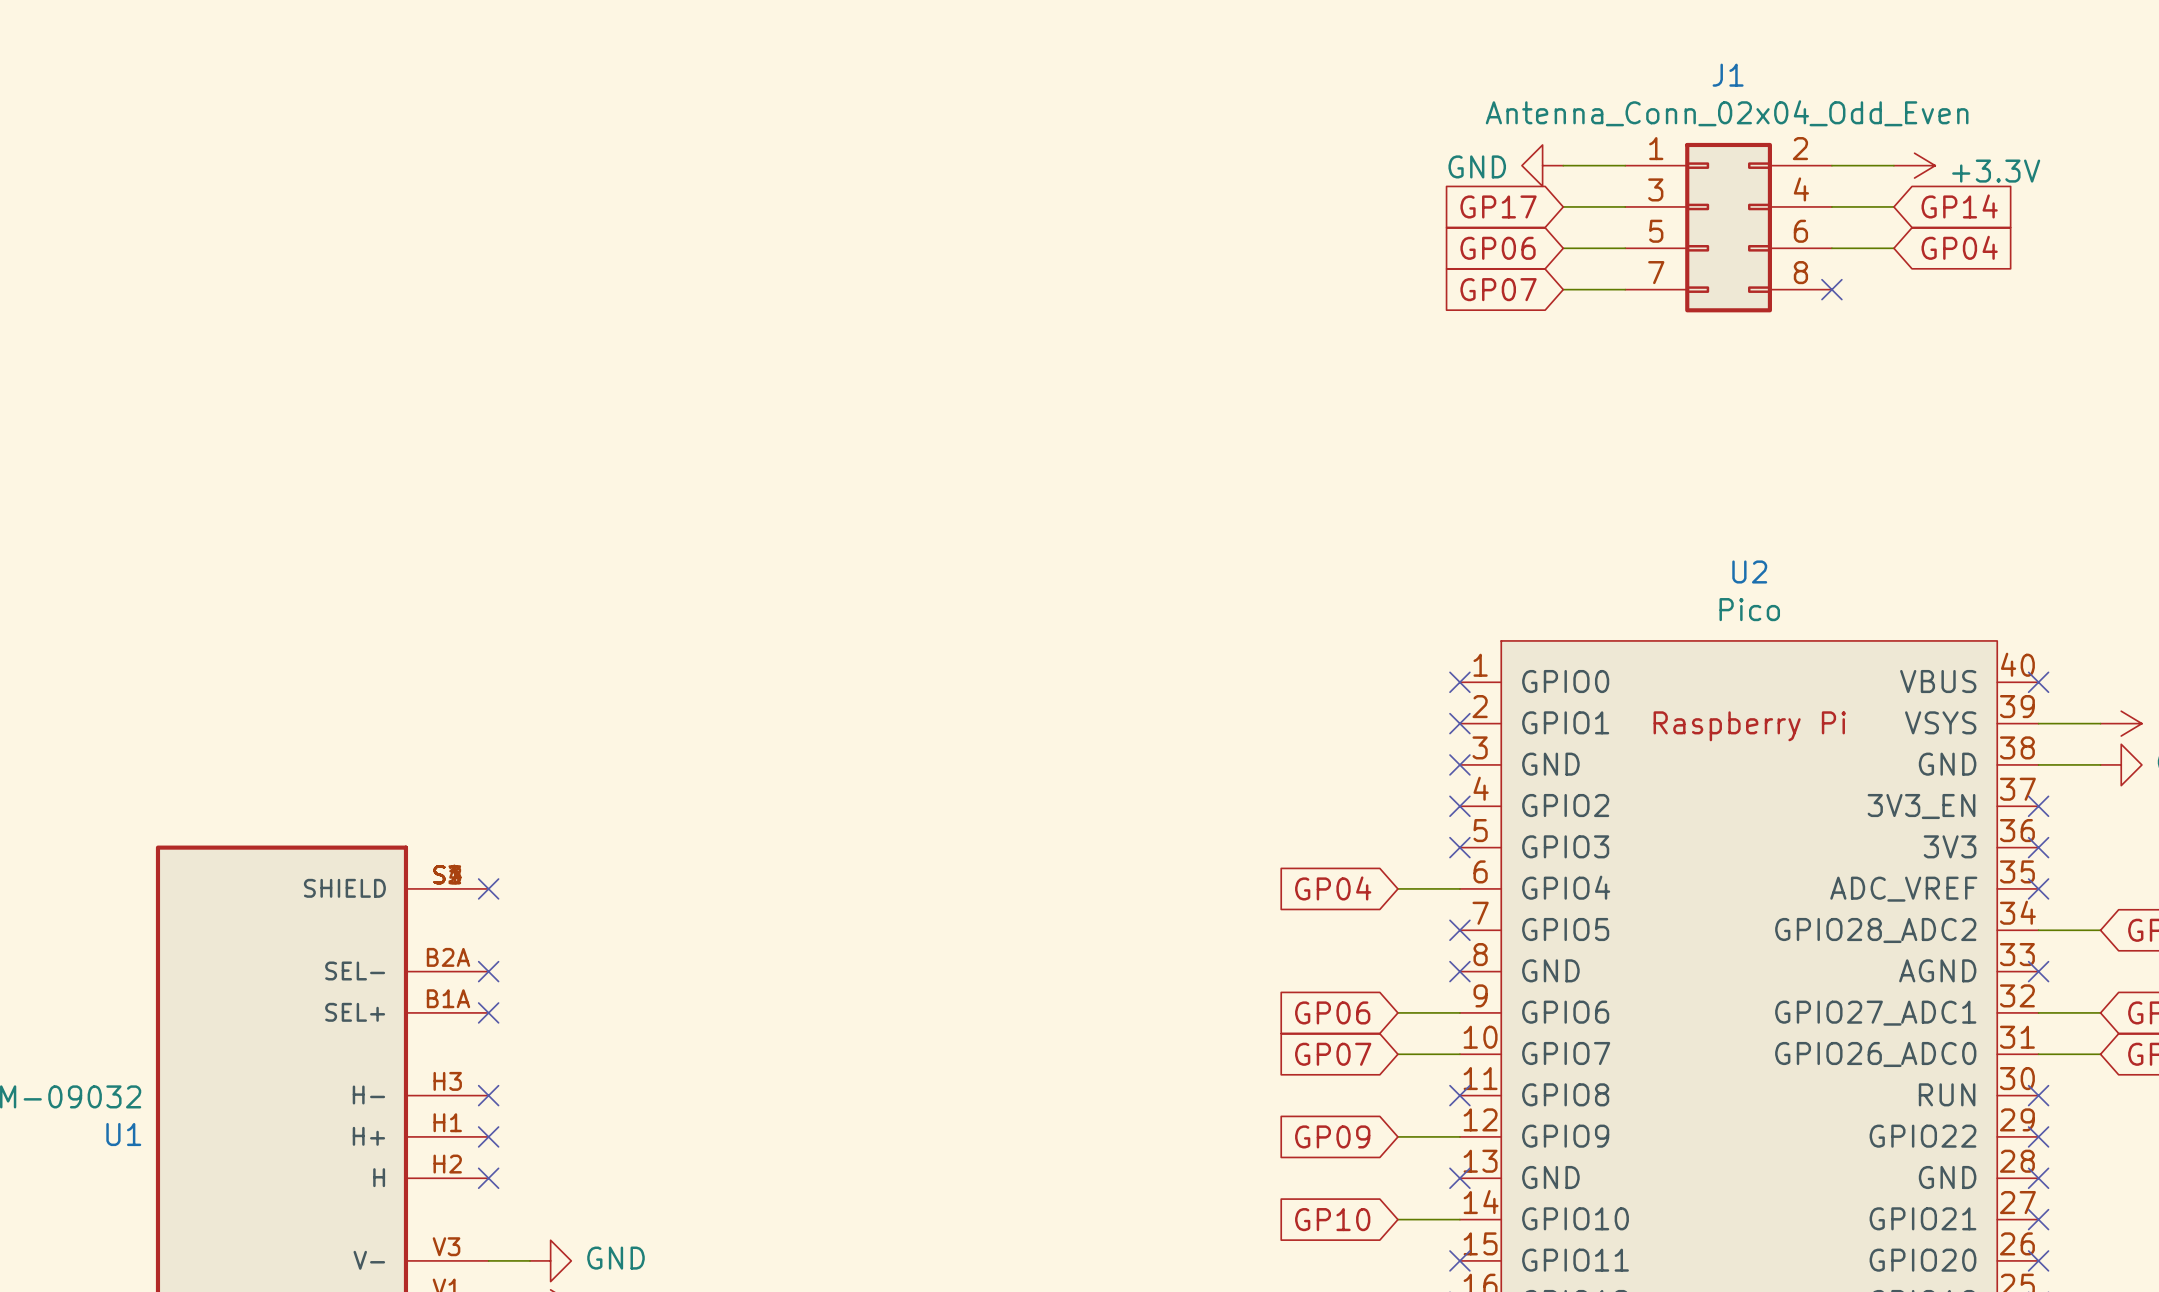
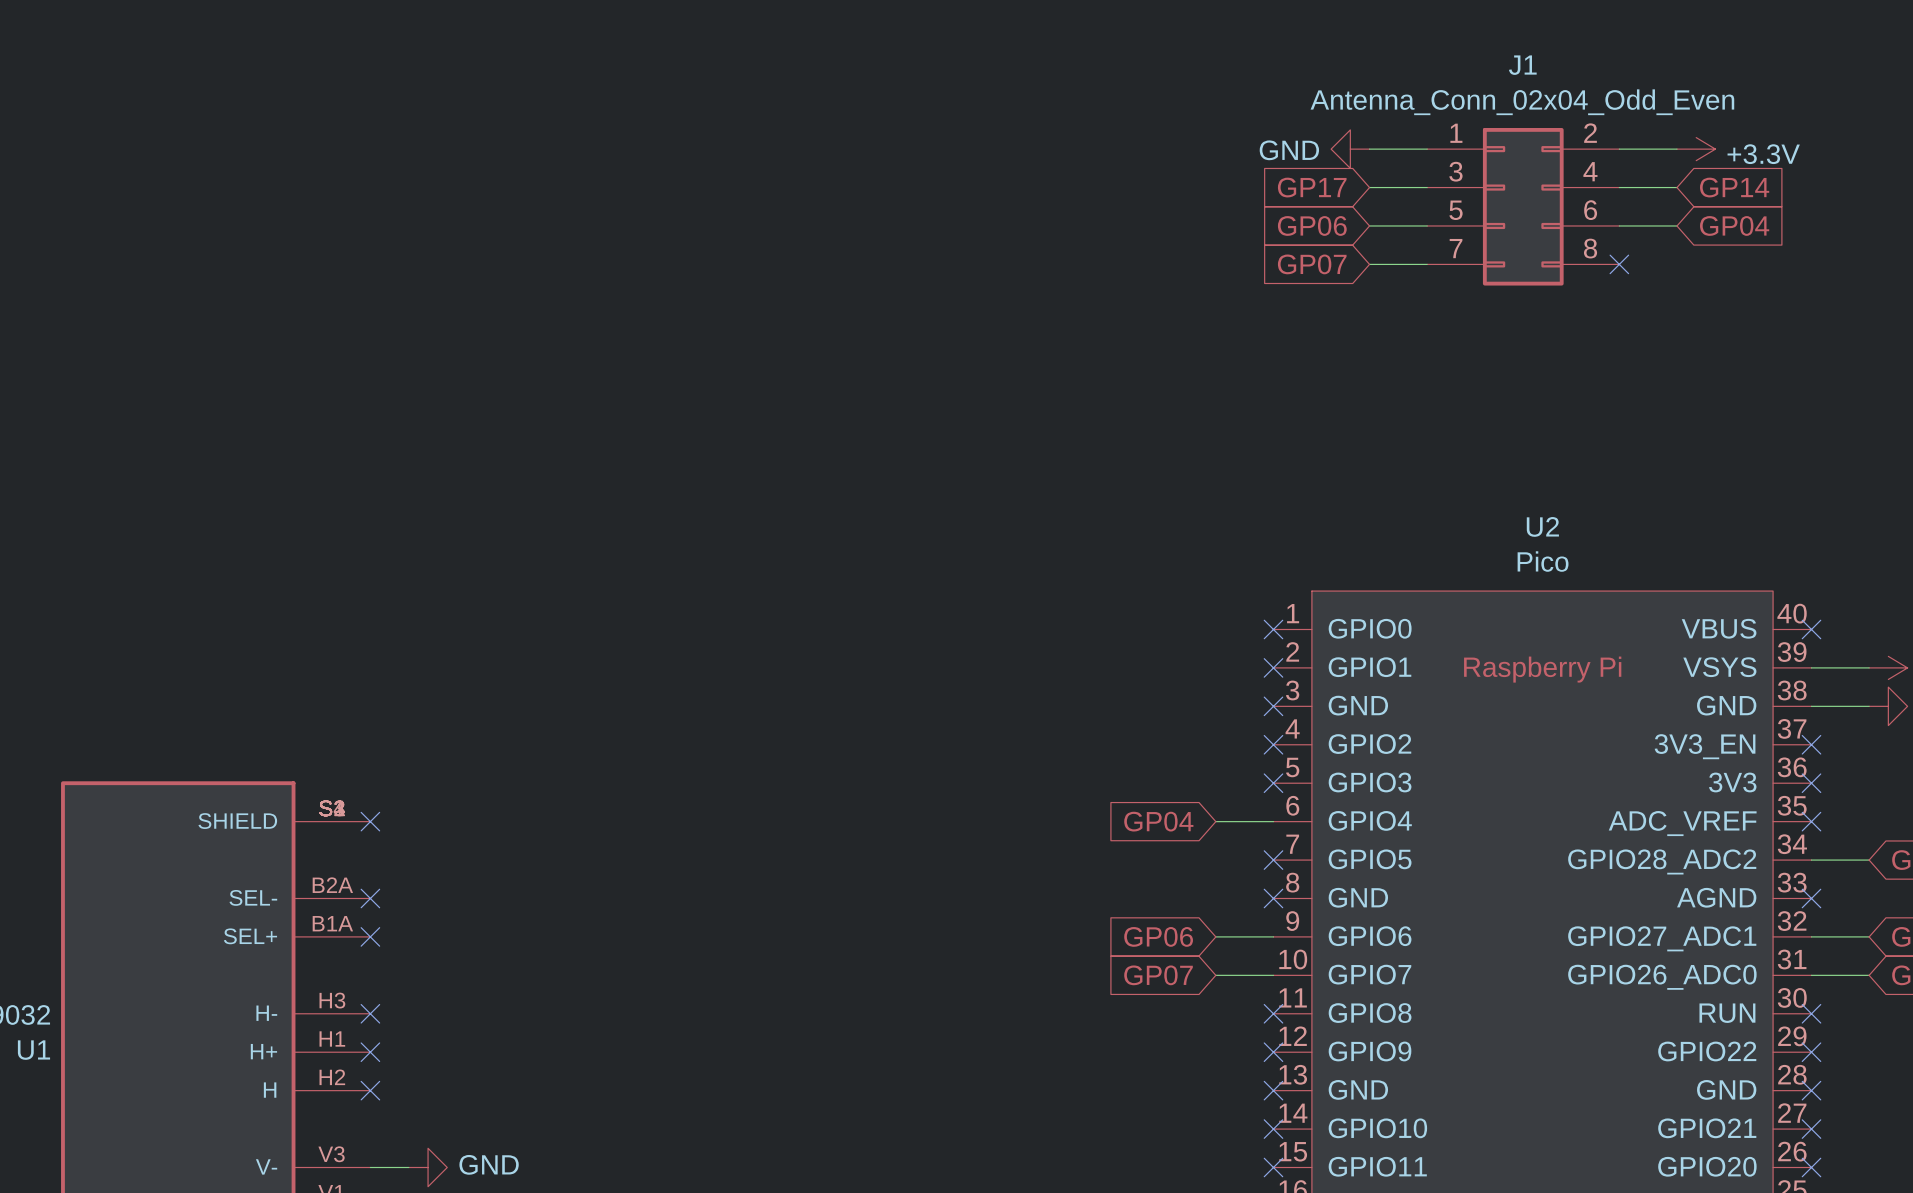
global label: GP09 (1332, 1136) -> none
wire: (1397, 1136) (1459, 1136) -> none
no-connect mark: none -> (1273, 1052)
global label: GP10 (1332, 1219) -> none
wire: (1397, 1219) (1459, 1219) -> none
no-connect mark: none -> (1273, 1129)

